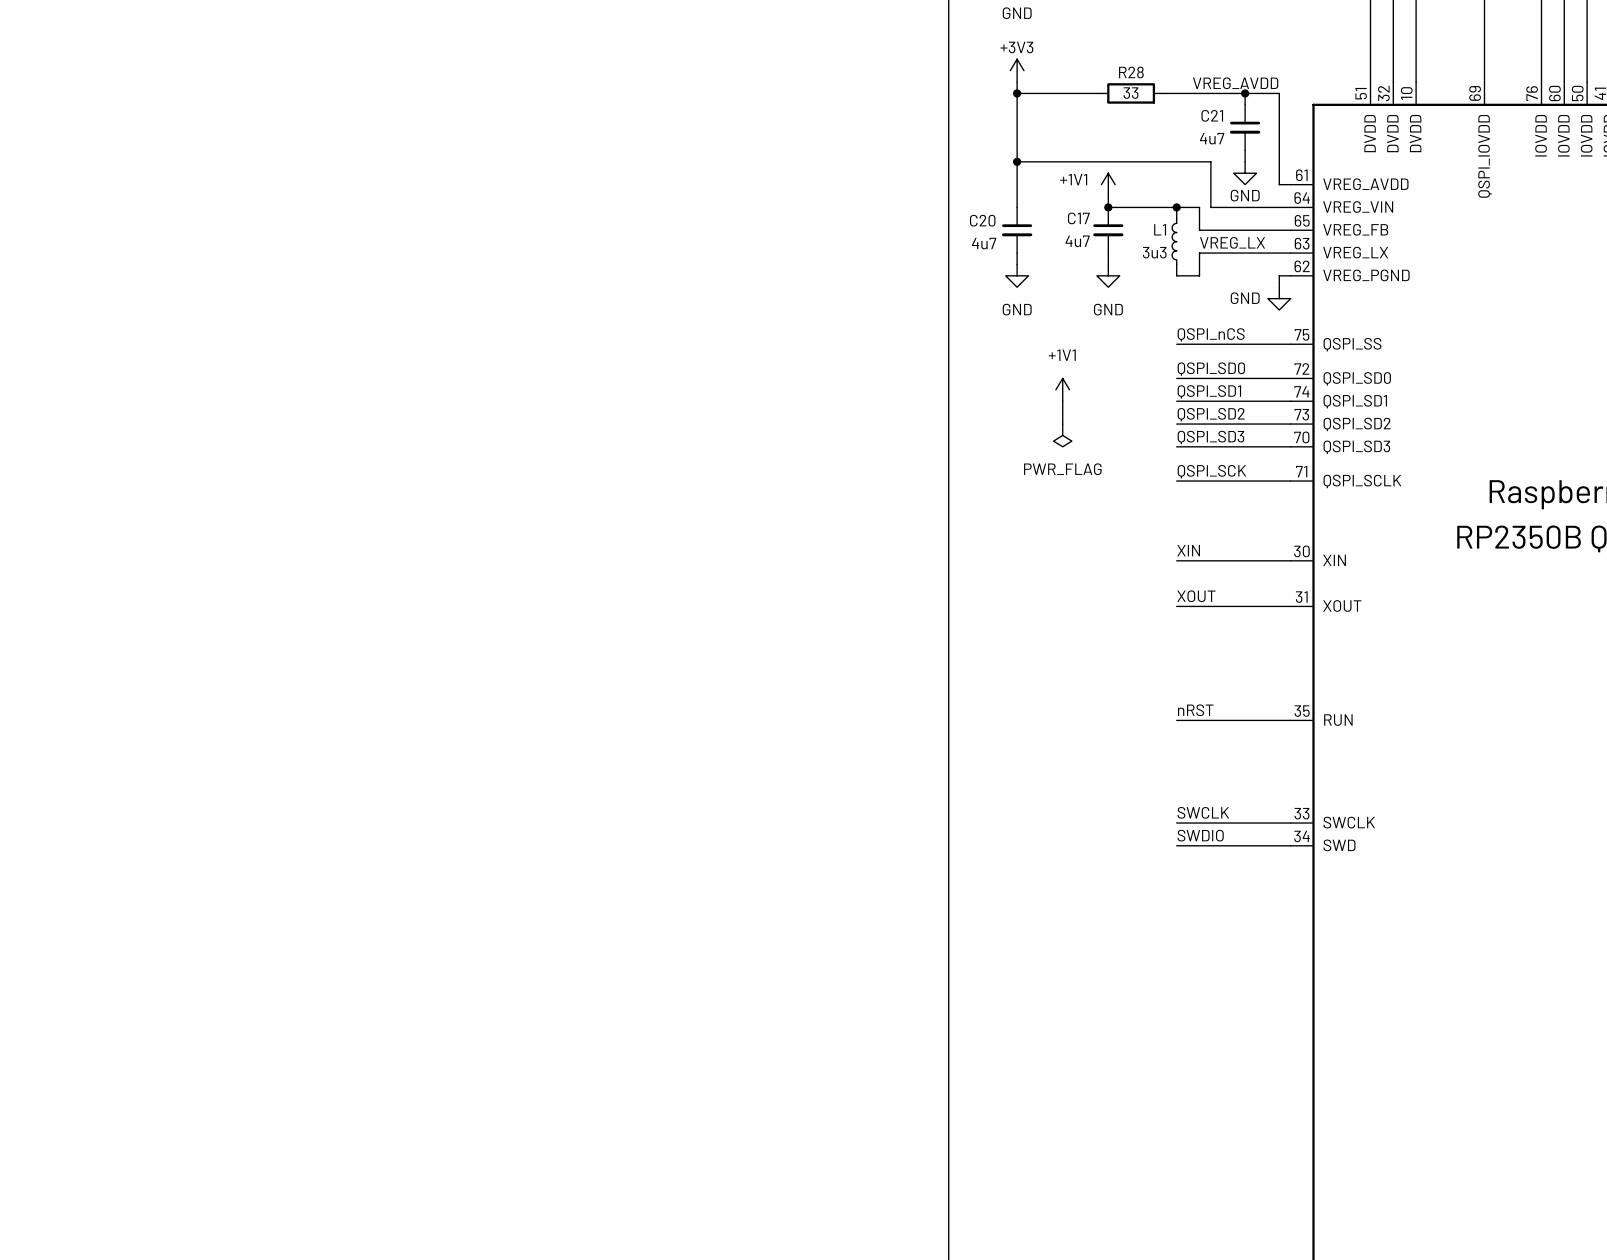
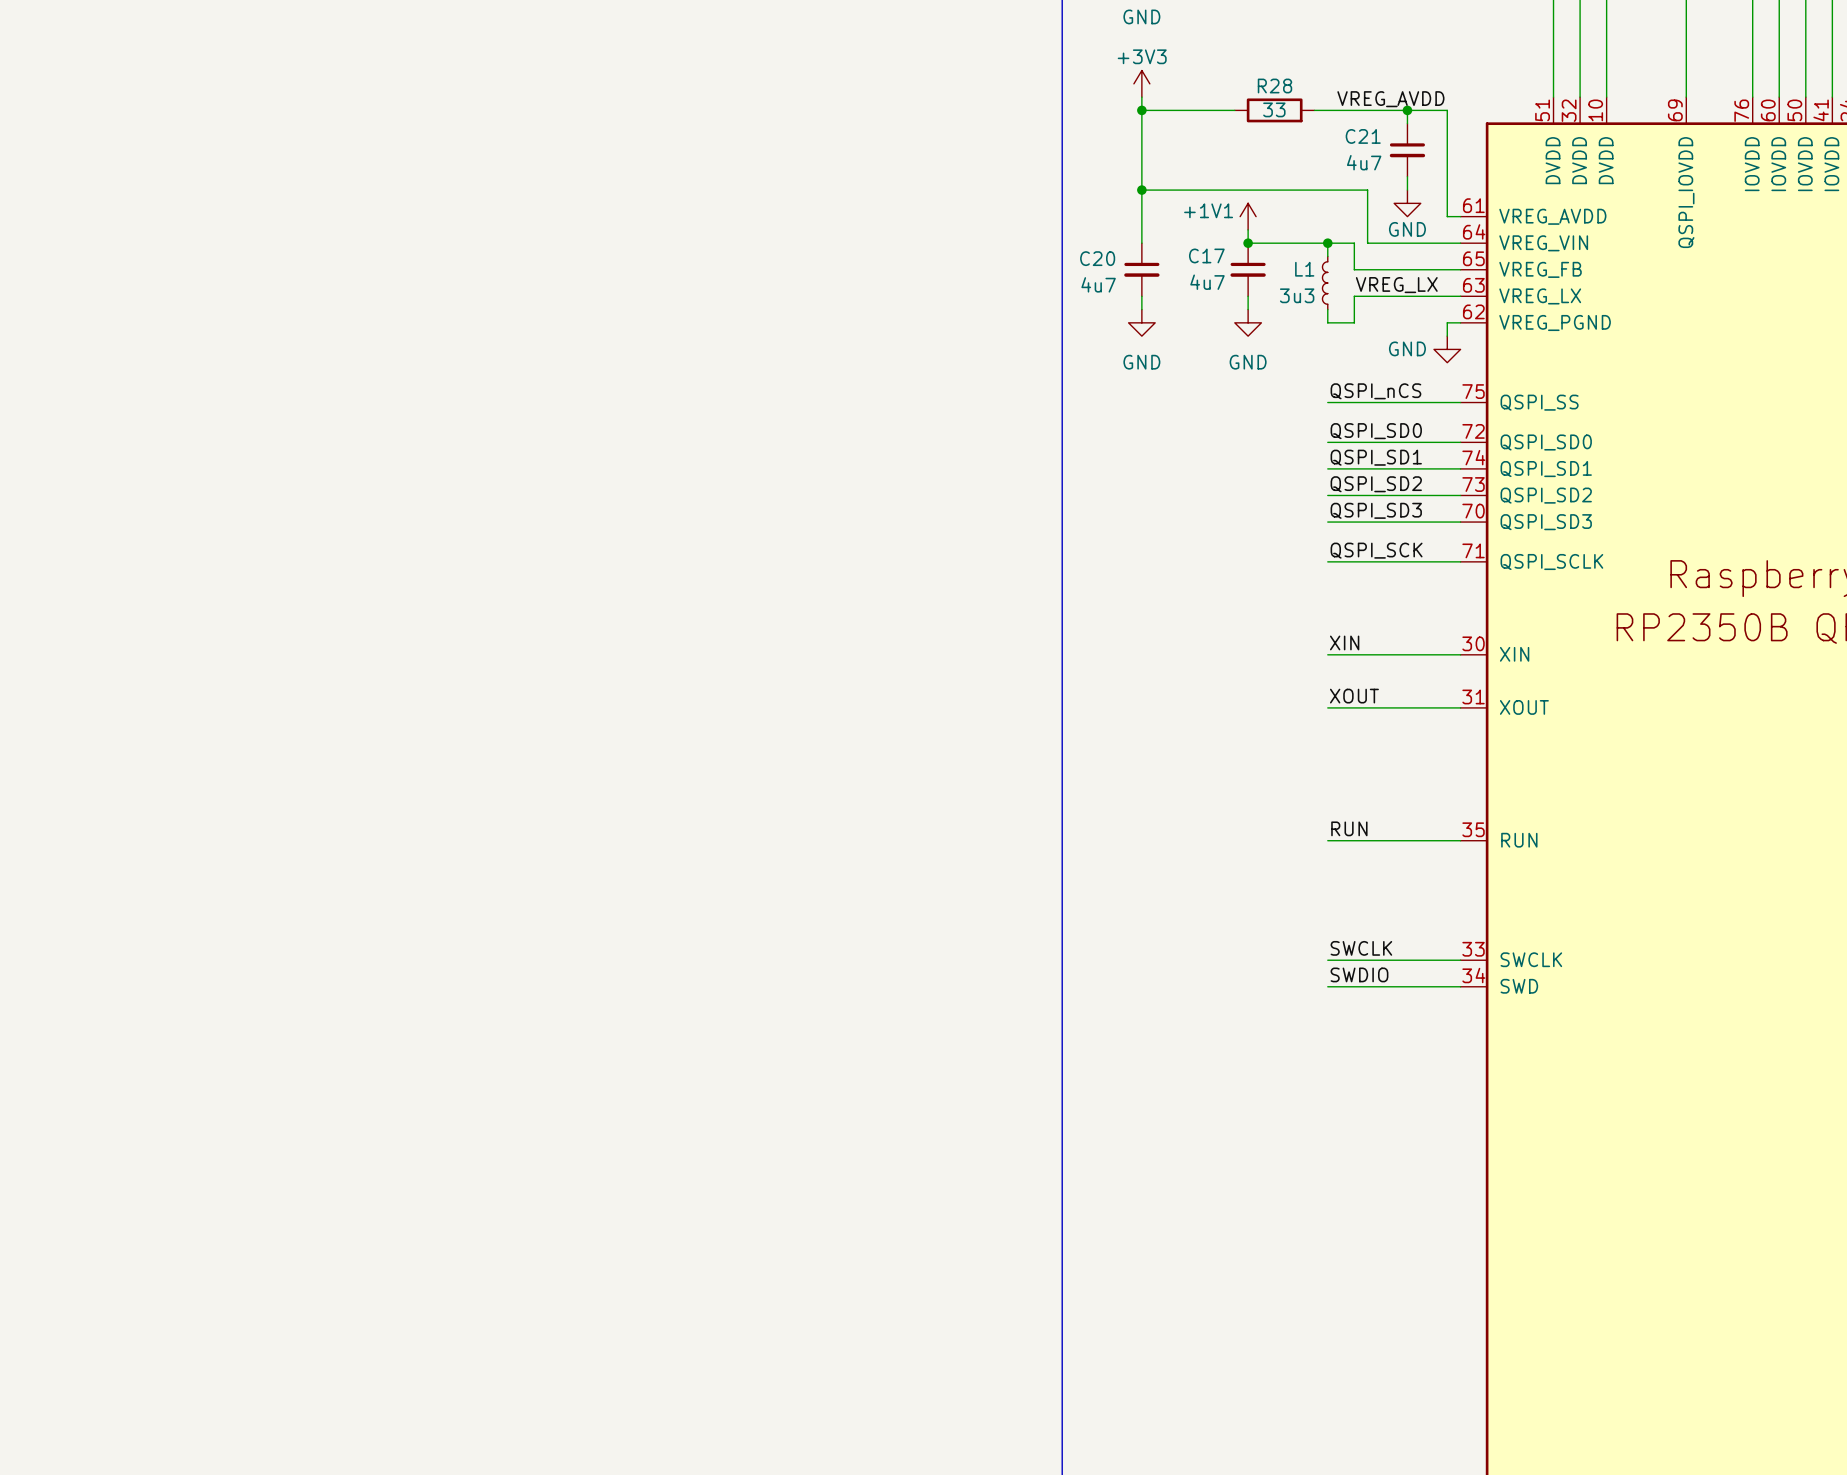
power symbol: +1V1 (1062, 389) -> none
wire: (1062, 401) (1062, 424) -> none
power symbol: PWR_FLAG (1062, 435) -> none
label: nRST (1195, 710) -> RUN (1349, 828)

